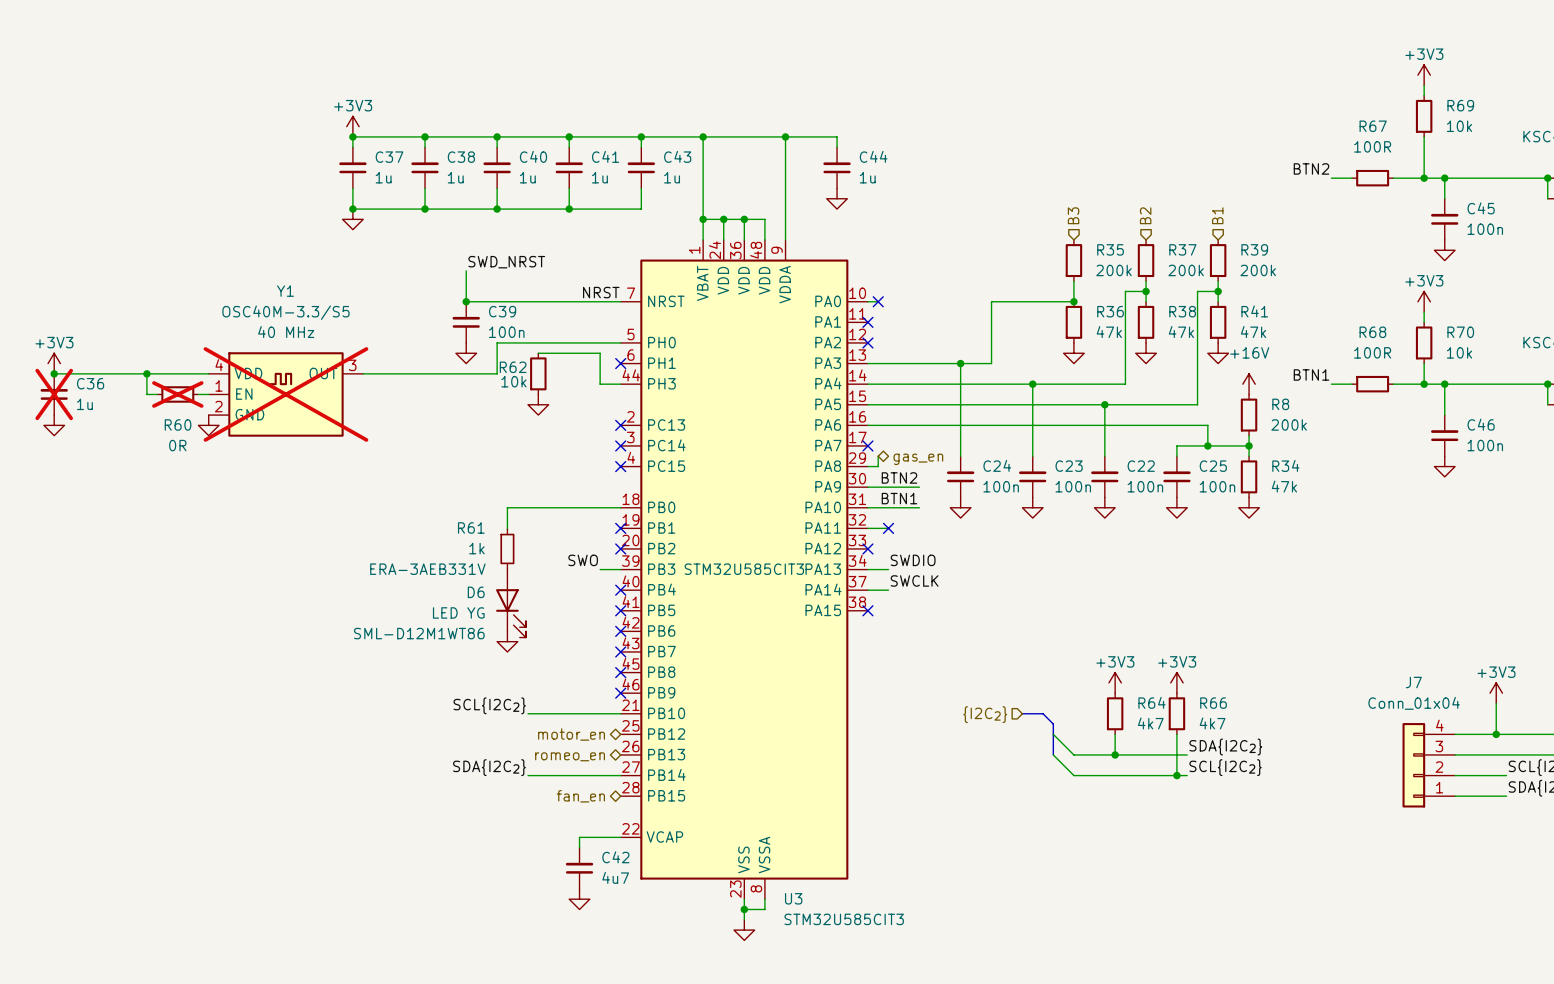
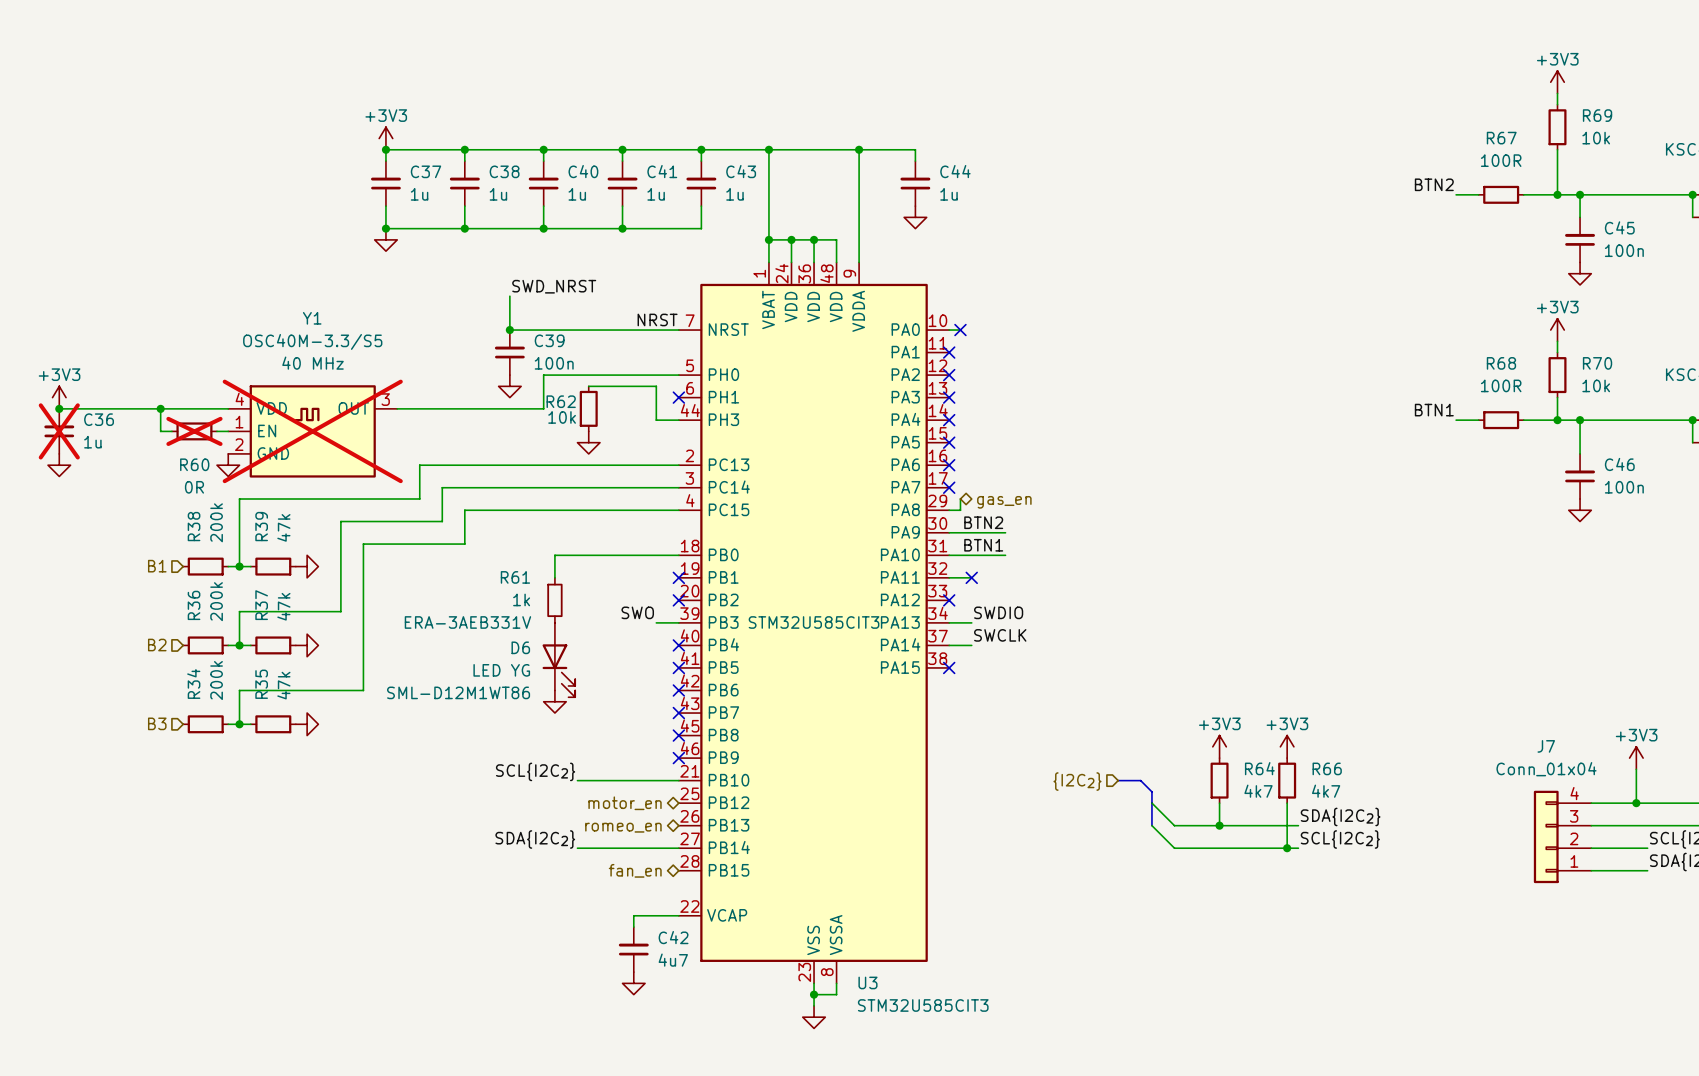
hierarchical label: B3 (1073, 215) -> none
hierarchical label: B2 (1145, 215) -> none
hierarchical label: B1 (1217, 215) -> none
R35 name position: R35 (1110, 249) -> R35 (261, 684)
R37 name position: R37 (1182, 249) -> R37 (261, 605)
R39 name position: R39 (1254, 249) -> R39 (261, 526)
R35 rotation: 0° (1073, 260) -> 90° clockwise (273, 724)
R35 position: (1073, 260) -> (273, 724)
R37 rotation: 0° (1146, 260) -> 90° clockwise (273, 645)
R37 position: (1146, 260) -> (273, 645)
R39 rotation: 0° (1218, 260) -> 90° clockwise (273, 566)
R39 position: (1218, 260) -> (273, 566)
R35 text: 200k (1113, 270) -> 47k (283, 685)
R37 text: 200k (1186, 270) -> 47k (283, 606)
R39 text: 200k (1258, 270) -> 47k (283, 527)
wire: (1073, 281) (1073, 301) (991, 301) (991, 363) (867, 363) -> none
wire: (1146, 281) (1146, 301) -> none
wire: (1218, 281) (1218, 301) -> none
wire: (1146, 291) (1125, 291) (1125, 384) (867, 384) -> none
junction: (1146, 291) -> none
wire: (1218, 291) (1197, 291) (1197, 404) (867, 404) -> none
junction: (1218, 291) -> none
junction: (1073, 301) -> none
R36 name position: R36 (1110, 311) -> R36 (194, 605)
R38 name position: R38 (1182, 311) -> R38 (194, 526)
R36 rotation: 0° (1073, 322) -> 90° clockwise (205, 645)
R36 position: (1073, 322) -> (205, 645)
R38 rotation: 0° (1146, 322) -> 90° clockwise (205, 566)
R38 position: (1146, 322) -> (205, 566)
R41: (1218, 322) -> none
R36 text: 47k (1109, 332) -> 200k (216, 601)
R38 text: 47k (1181, 332) -> 200k (216, 522)
power symbol: (1073, 353) -> none
power symbol: (1146, 353) -> none
power symbol: (1218, 353) -> none
no-connect mark: none -> (949, 397)
wire: (960, 363) (960, 456) -> none
junction: (960, 363) -> none
no-connect mark: none -> (949, 420)
wire: (1032, 384) (1032, 456) -> none
junction: (1032, 384) -> none
power symbol: +16V (1249, 384) -> none
no-connect mark: none -> (949, 442)
wire: (1104, 404) (1104, 456) -> none
junction: (1104, 404) -> none
R8: (1249, 415) -> none
wire: none -> (678, 465) (419, 465) (419, 498) (239, 498) (239, 566)
no-connect mark: (620, 425) -> none
wire: (867, 425) (1207, 425) (1207, 445) -> none
no-connect mark: none -> (949, 465)
wire: (1249, 435) (1249, 456) -> none
wire: none -> (678, 487) (442, 487) (442, 521) (340, 521) (340, 611) (239, 611) (239, 645)
no-connect mark: (620, 445) -> none
junction: (1207, 445) -> none
wire: (1249, 445) (1176, 445) (1176, 456) -> none
junction: (1249, 445) -> none
R34 name position: R34 (1285, 465) -> R34 (193, 683)
wire: none -> (678, 510) (464, 510) (464, 544) (363, 544) (363, 690) (239, 690) (239, 724)
no-connect mark: (620, 466) -> none
C24: (960, 476) -> none
C23: (1032, 476) -> none
C22: (1104, 476) -> none
C25: (1176, 476) -> none
R34 rotation: 0° (1249, 476) -> 90° clockwise (205, 724)
R34 position: (1249, 476) -> (205, 724)
R34 text: 47k (1284, 486) -> 200k (216, 680)
power symbol: (960, 507) -> none
power symbol: (1032, 507) -> none
power symbol: (1104, 507) -> none
power symbol: (1176, 507) -> none
power symbol: (1249, 507) -> none
hierarchical label: none -> B1 (157, 566)
wire: none -> (228, 566) (250, 566)
junction: none -> (239, 566)
power symbol: none -> (307, 566)
hierarchical label: none -> B2 (157, 645)
wire: none -> (228, 645) (250, 645)
junction: none -> (239, 645)
power symbol: none -> (307, 645)
hierarchical label: none -> B3 (157, 723)
wire: none -> (228, 724) (250, 724)
junction: none -> (239, 724)
power symbol: none -> (307, 724)

